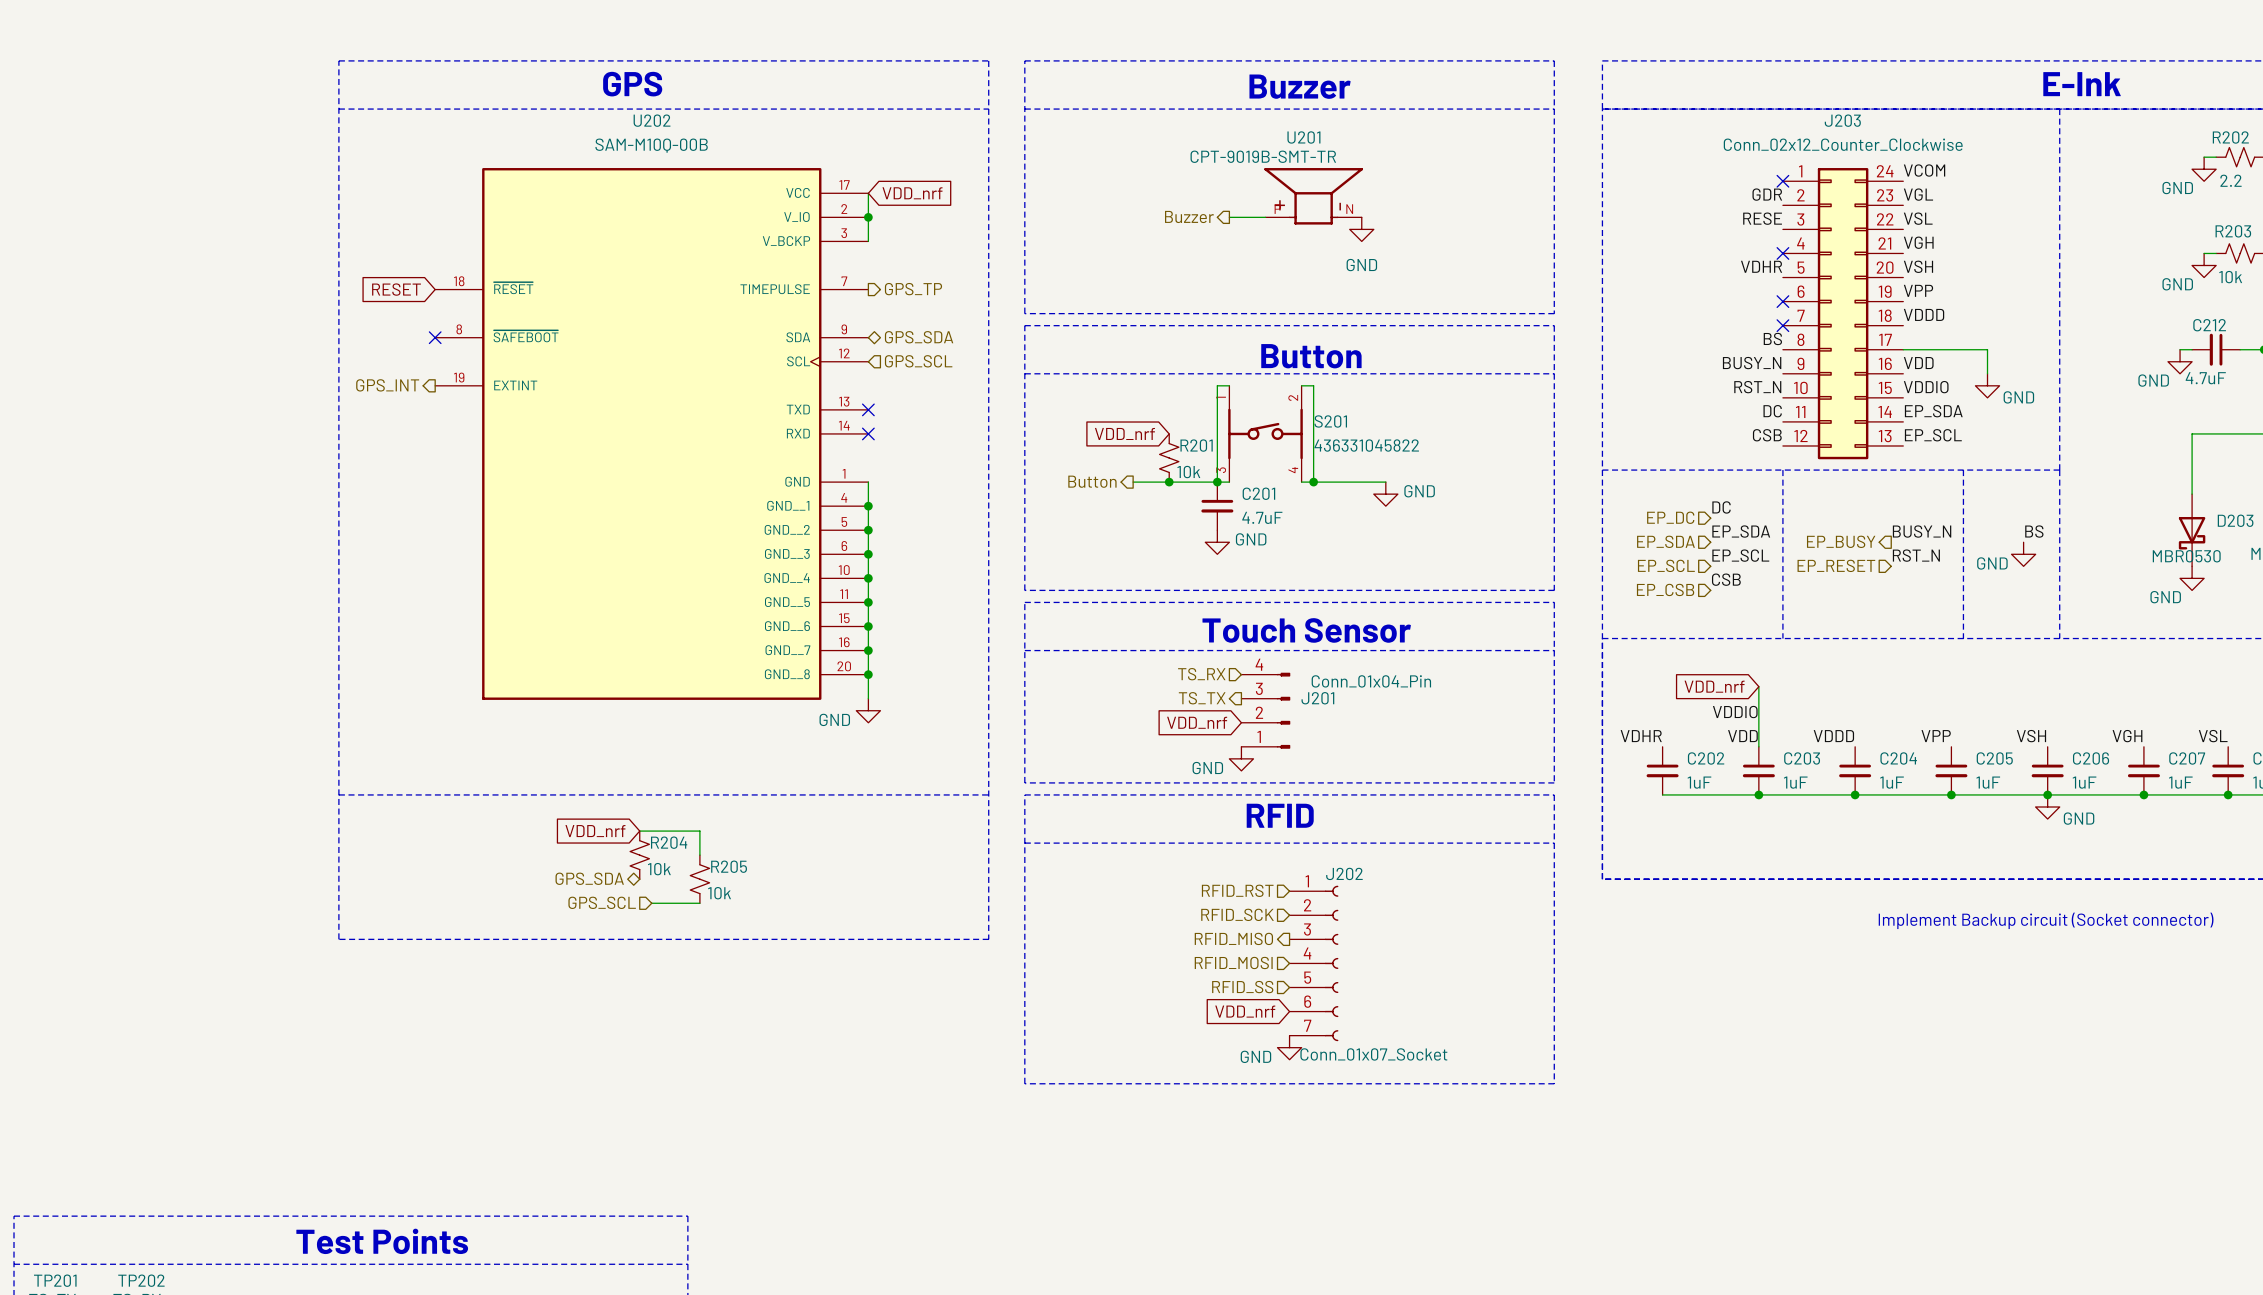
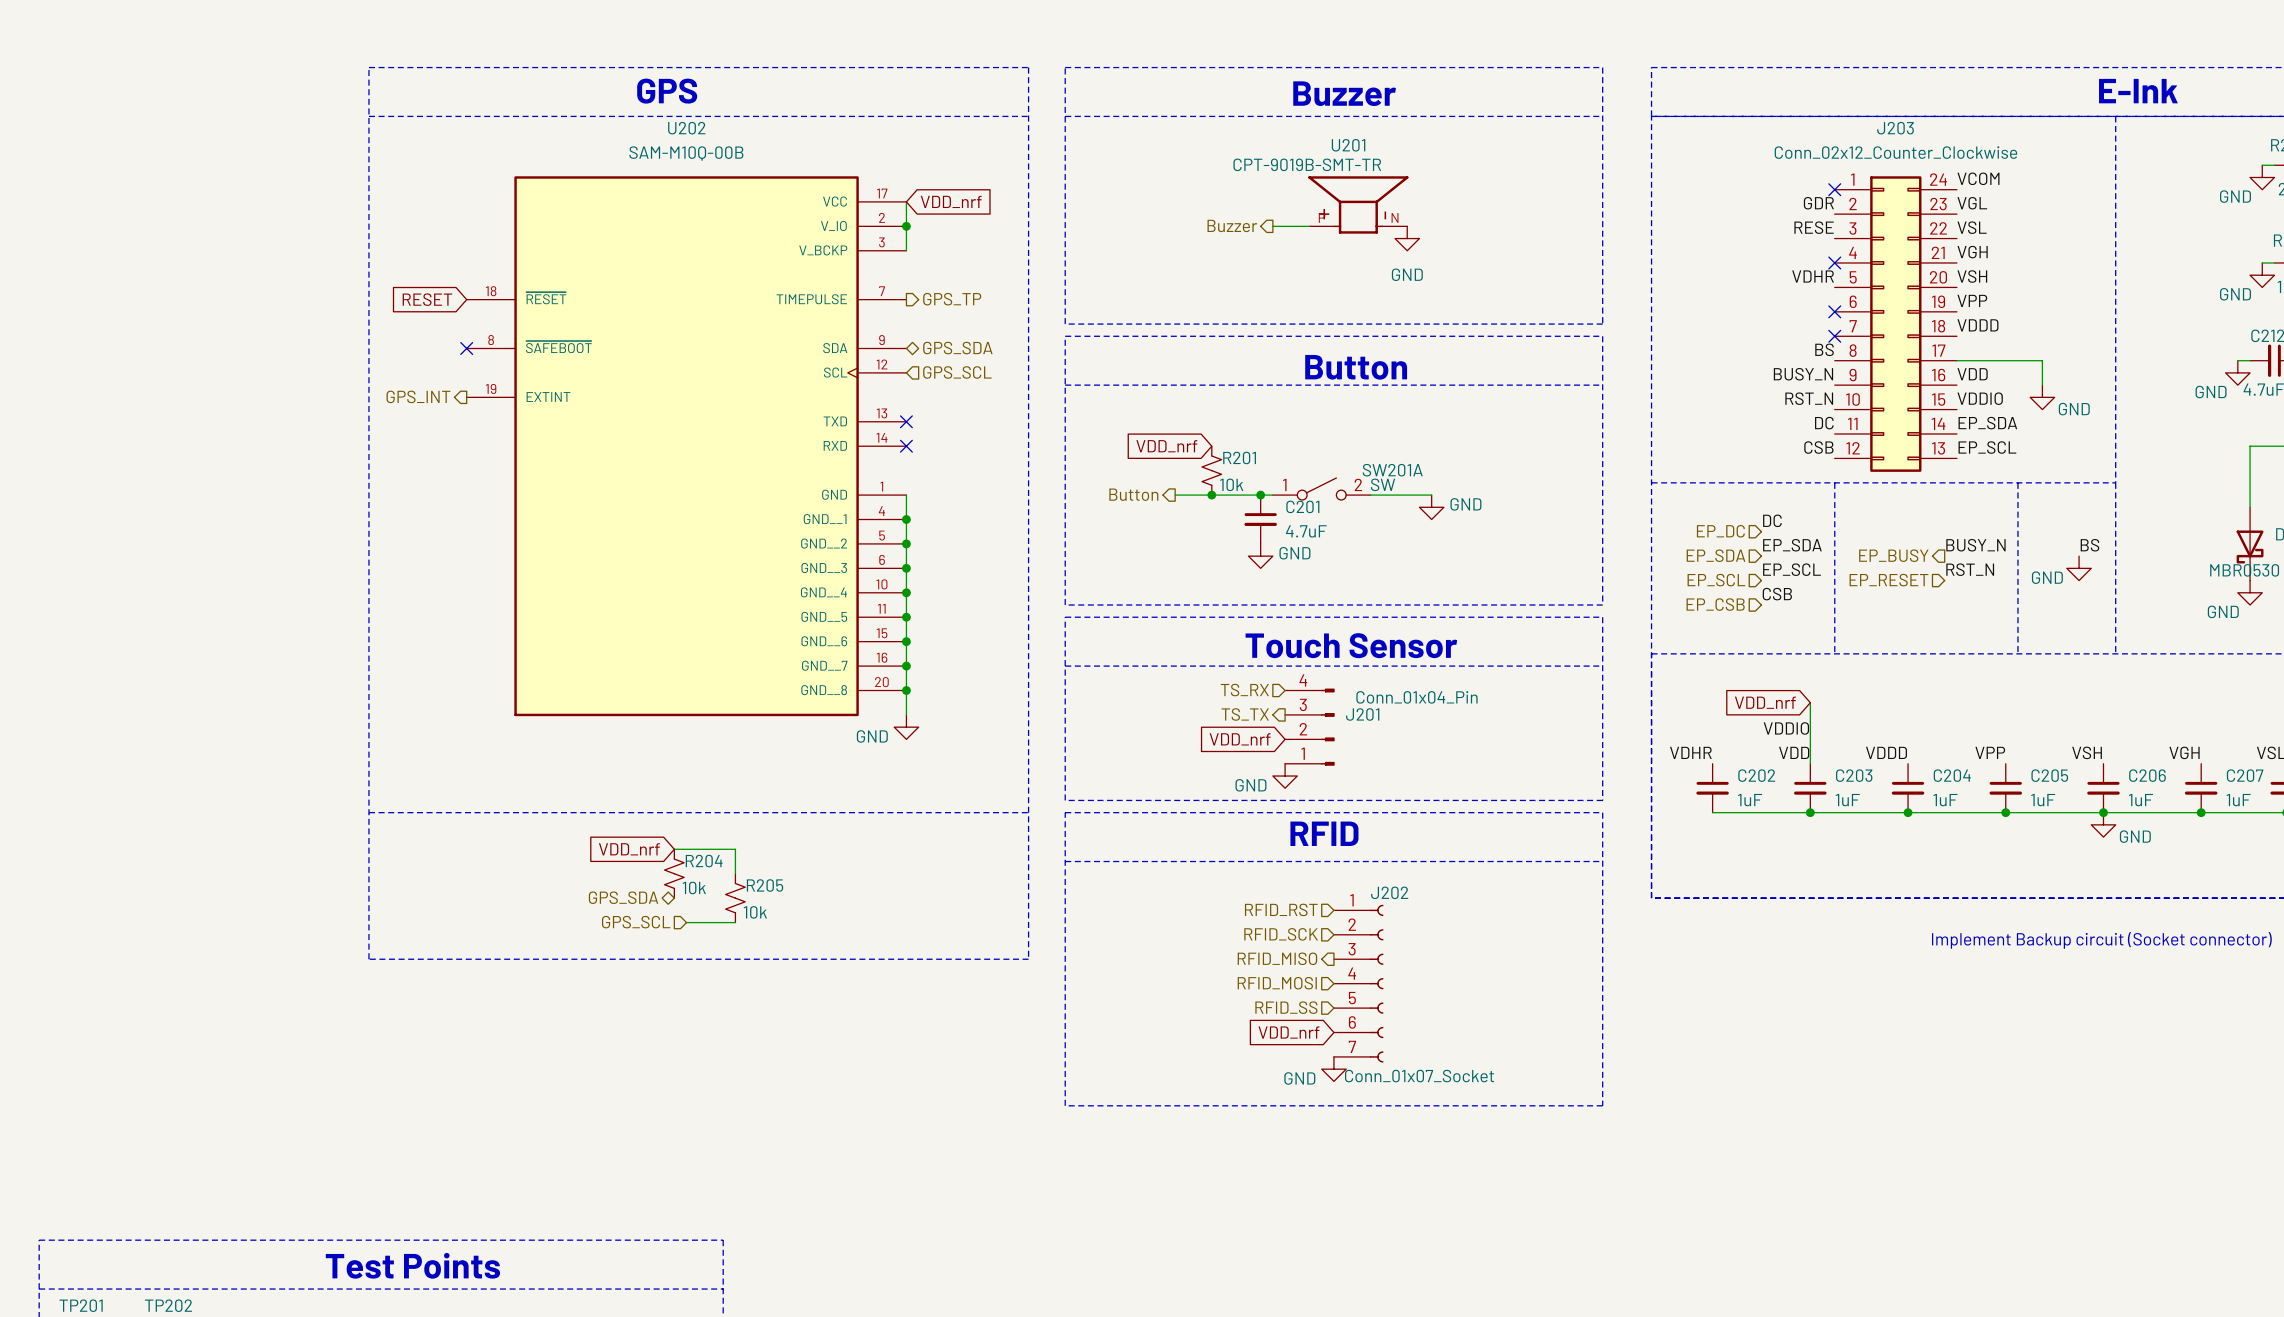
wire: (1229, 385) (1217, 385) (1217, 482) -> none
wire: (1301, 385) (1313, 385) (1313, 482) -> none
S201: 436331045822 (1265, 433) -> none
SW201A: none -> SW (1321, 488)
junction: (1313, 482) -> none

